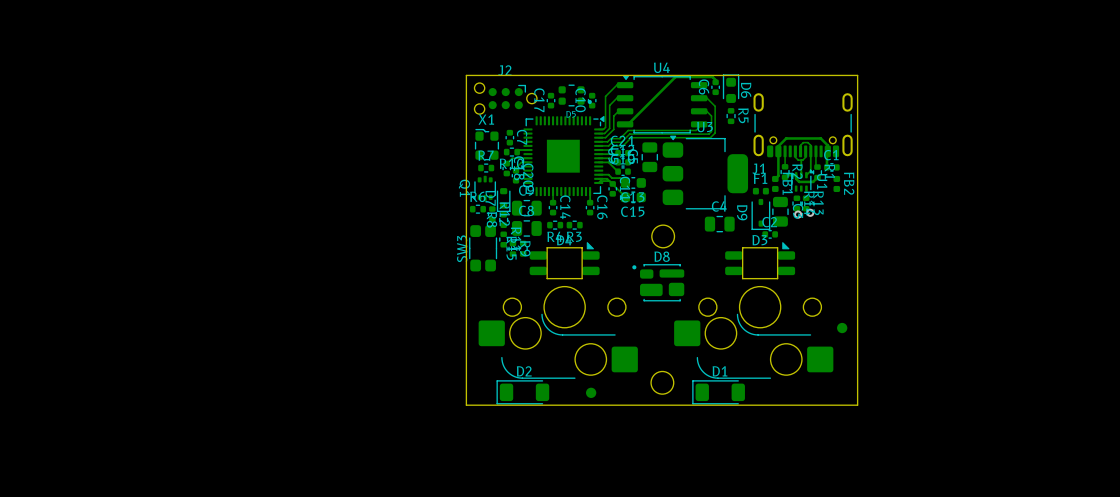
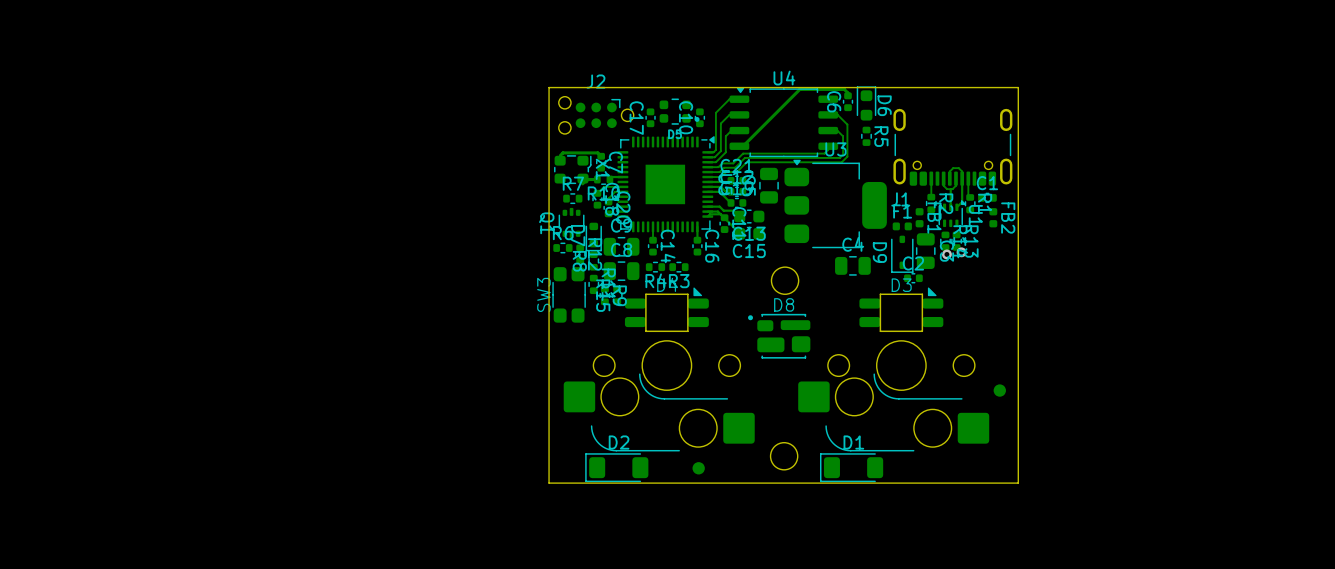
bottom track: none -> (560, 155) (562, 152) (597, 152) (601, 156)
X1 rotation: 0° (486, 144) -> 90° clockwise (572, 169)
bottom track: none -> (597, 179) (586, 179) (582, 183)
bottom track: (826, 167) (827, 145) (820, 138) (786, 138) (778, 146) (778, 175) (775, 178) -> none
bottom track: (785, 177) (787, 175) (796, 175) (796, 178) (799, 181) (813, 181) (817, 177) -> none

